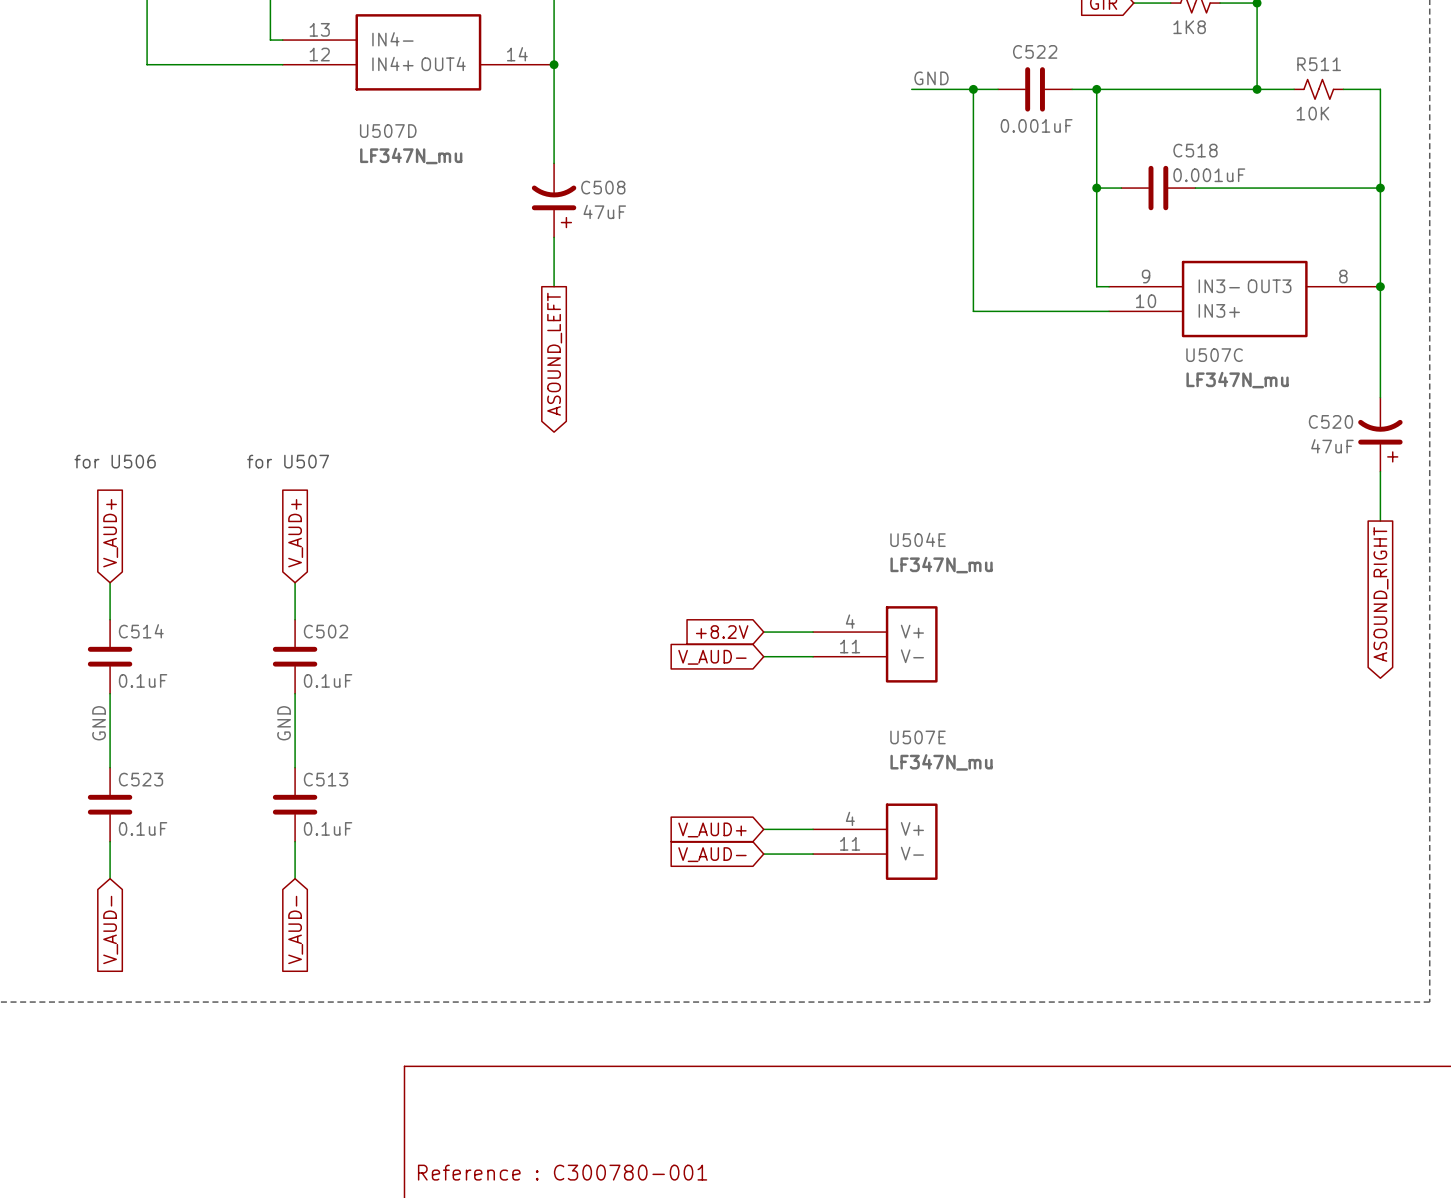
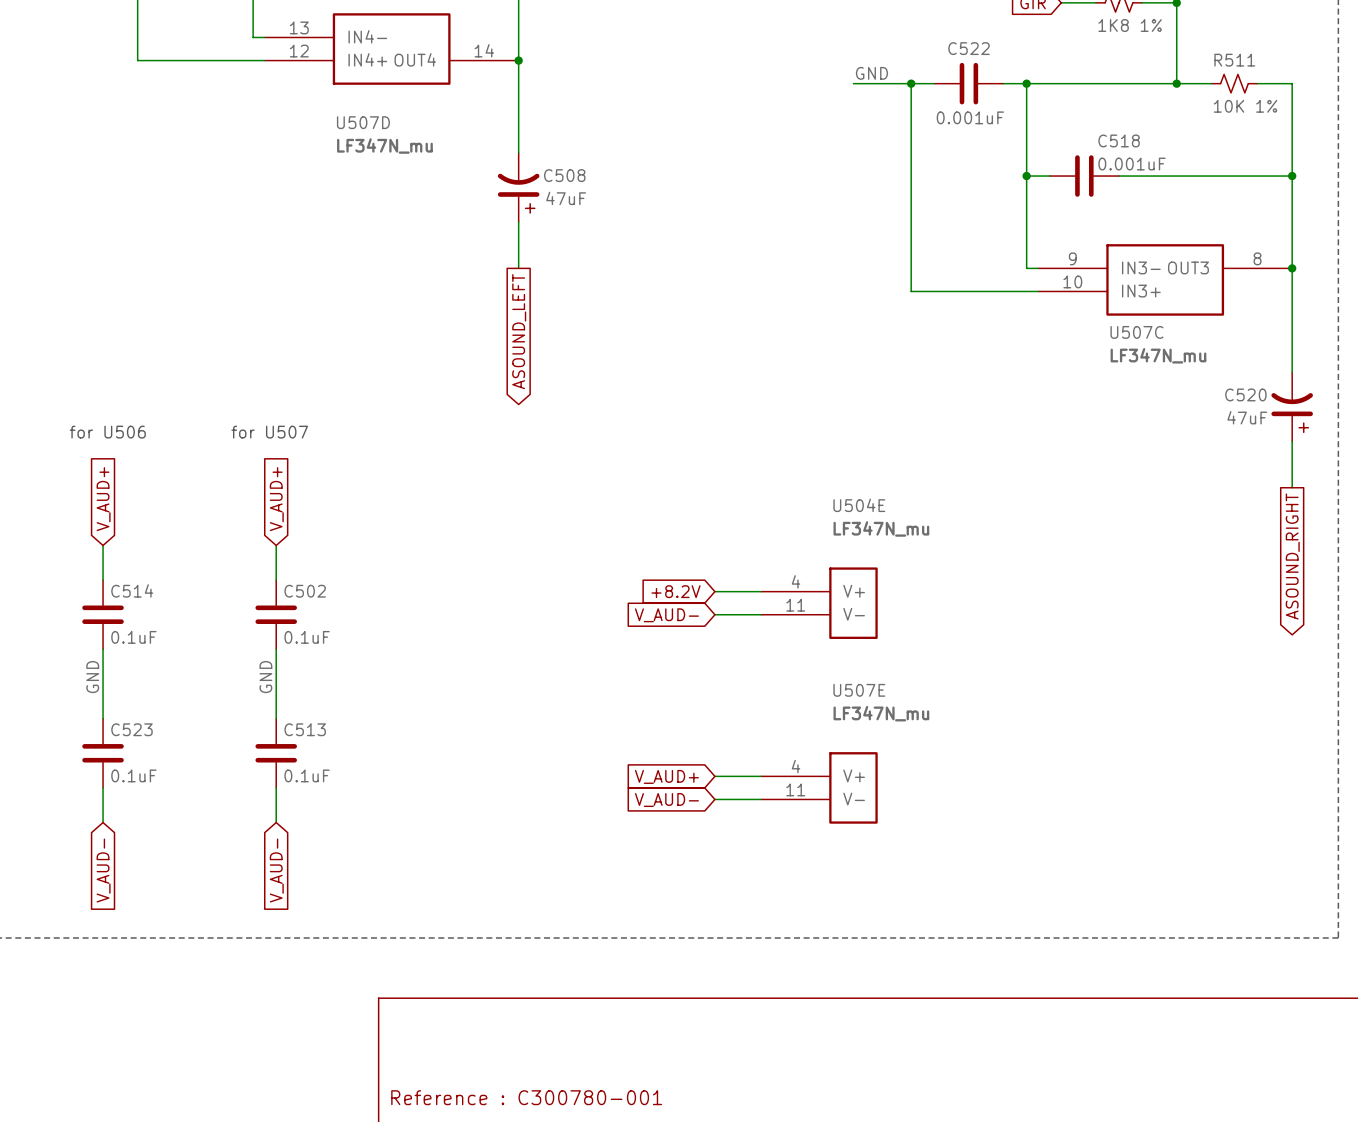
part value: 1K8 (1189, 27) -> 1K8 1% (1130, 25)
R511 value: 10K (1312, 113) -> 10K 1% (1245, 106)

